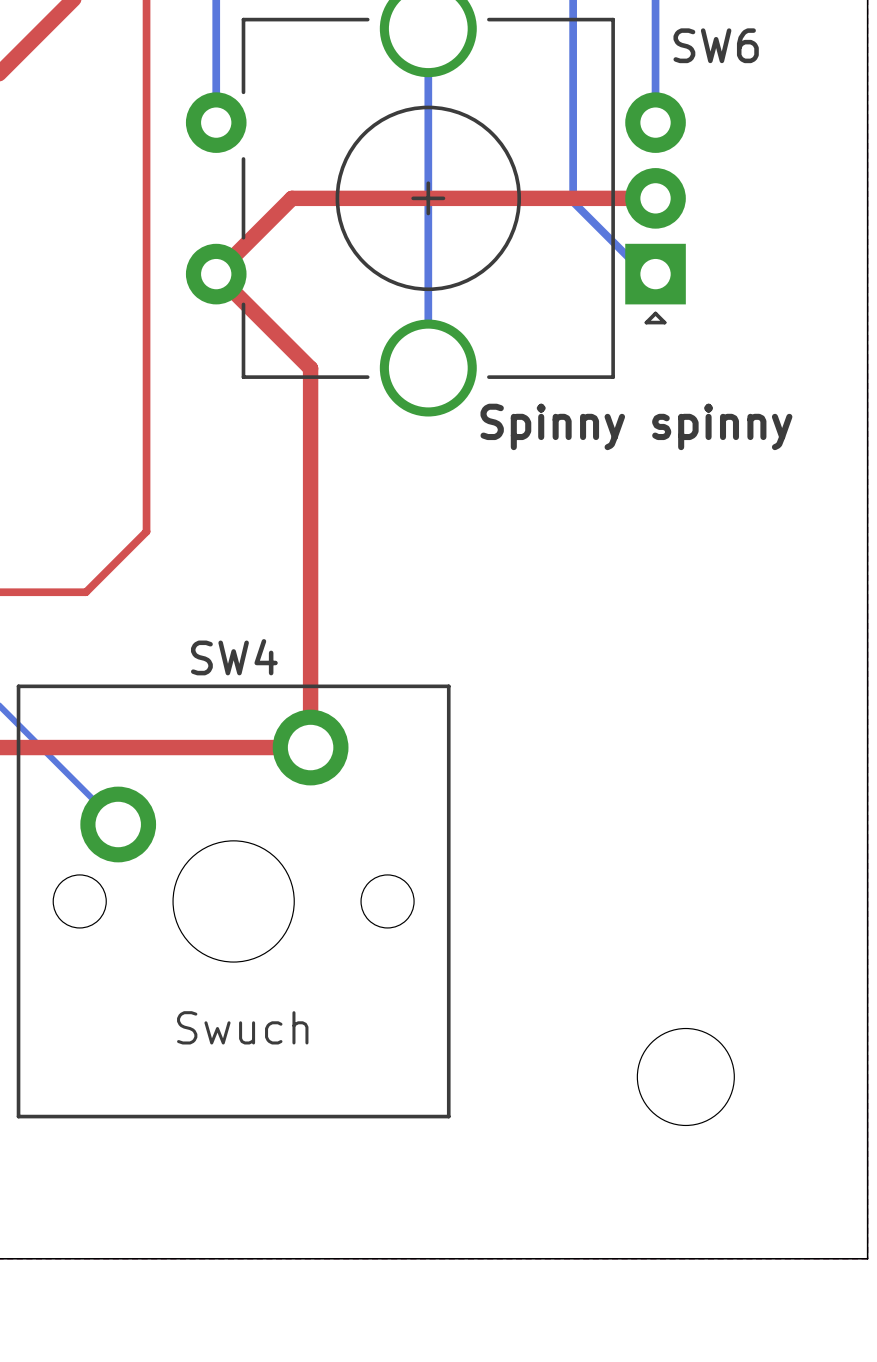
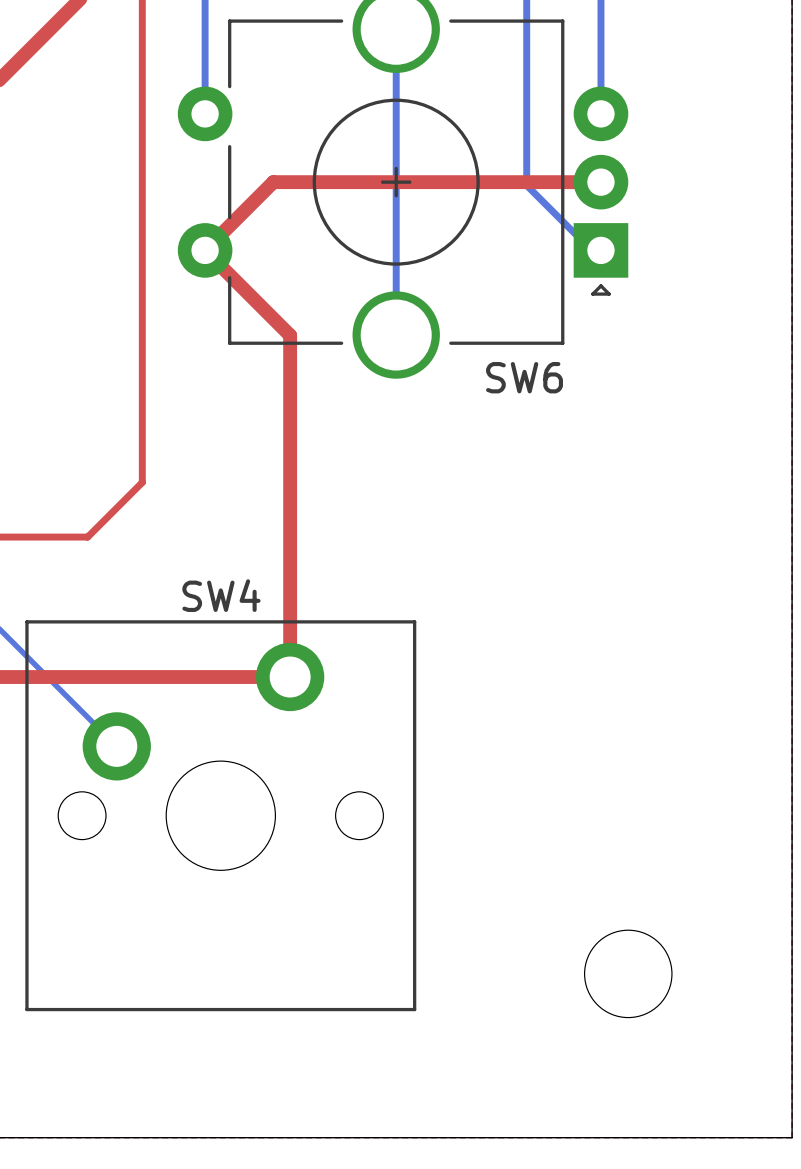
SW6 name position: SW6 (716, 45) -> SW6 (524, 377)
text: Spinny spinny (636, 426) -> none
text: Swuch (242, 1027) -> none

